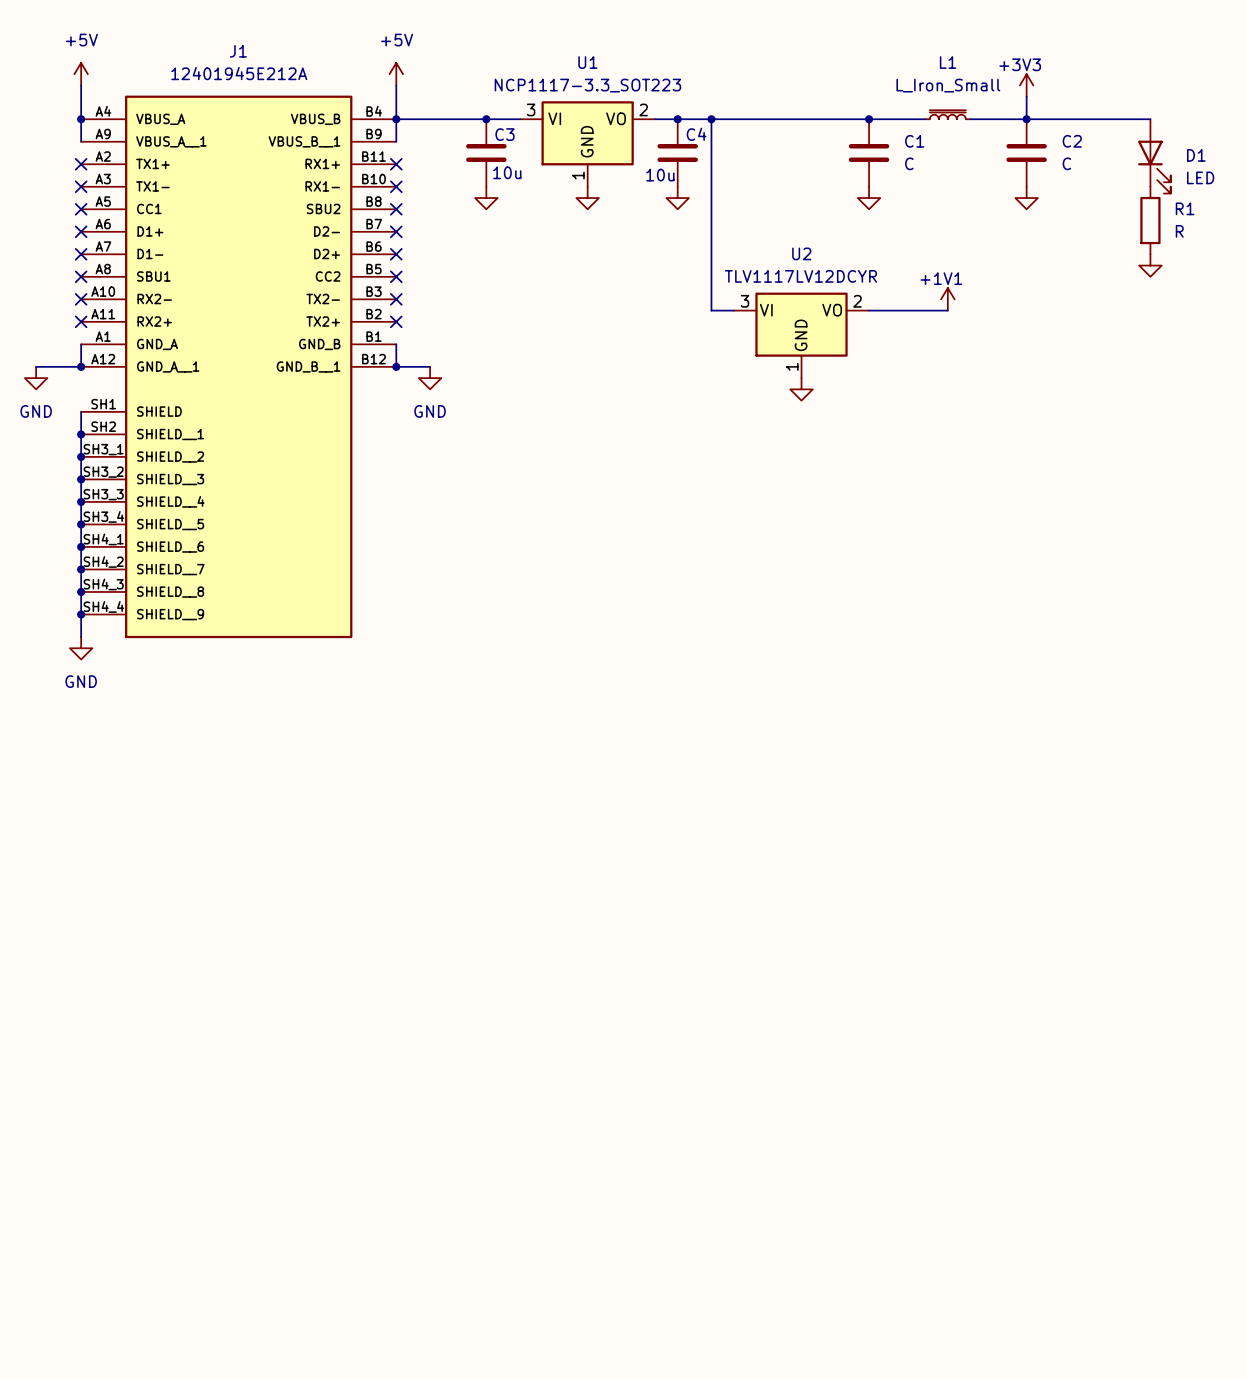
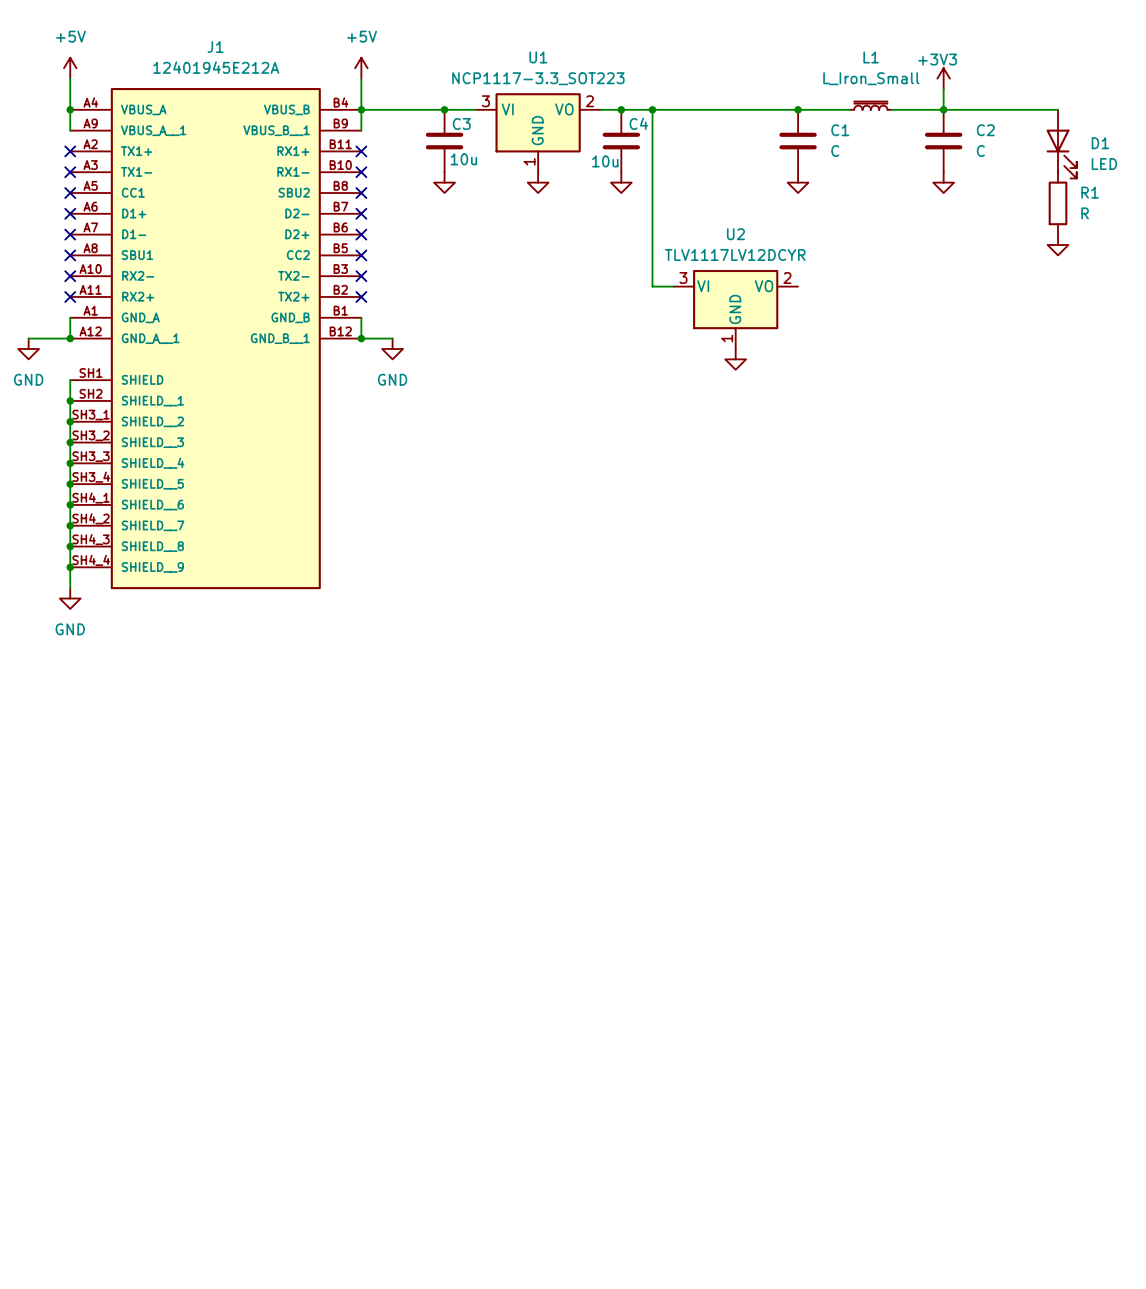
power symbol: +1V1 (947, 299) -> none
wire: (869, 310) (947, 310) -> none

